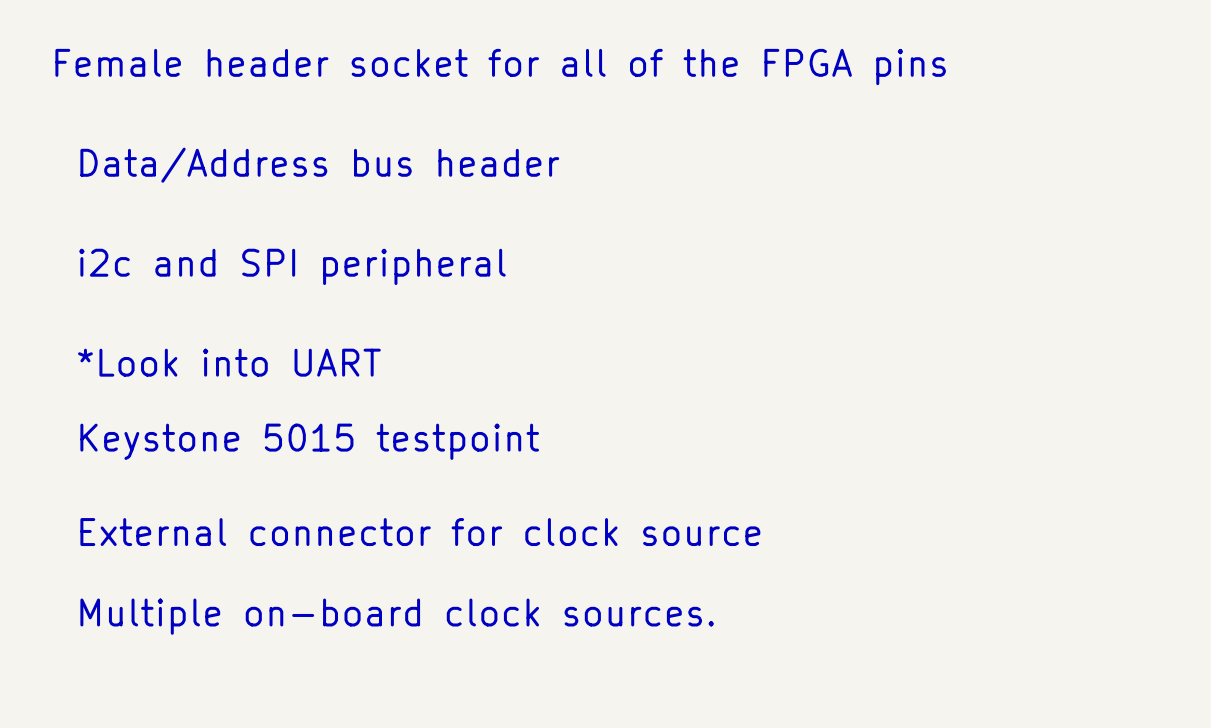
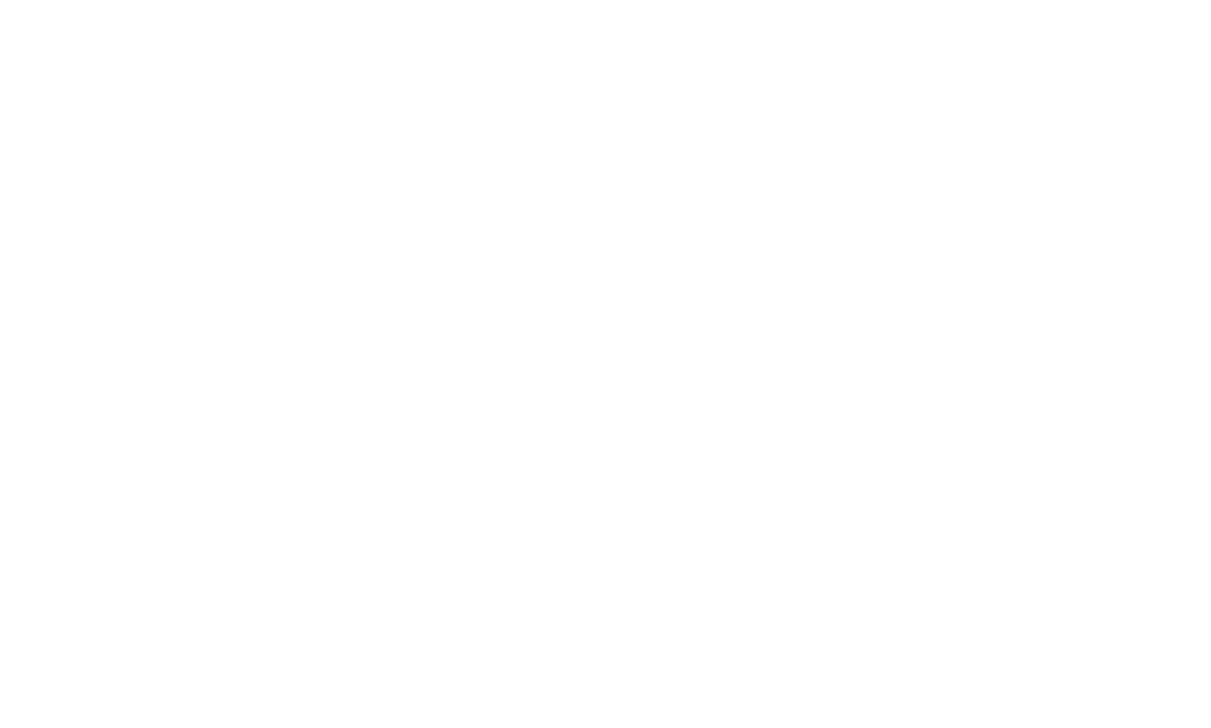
text: Female header socket for all of the FPGA pins (500, 67) -> none
text: Data/Address bus header (319, 165) -> none
text: i2c and SPI peripheral (292, 266) -> none
text: *Look into UART (229, 362) -> none
text: Keystone 5015 testpoint (309, 441) -> none
text: External connector for clock source (420, 532) -> none
text: Multiple on-board clock sources. (397, 616) -> none

